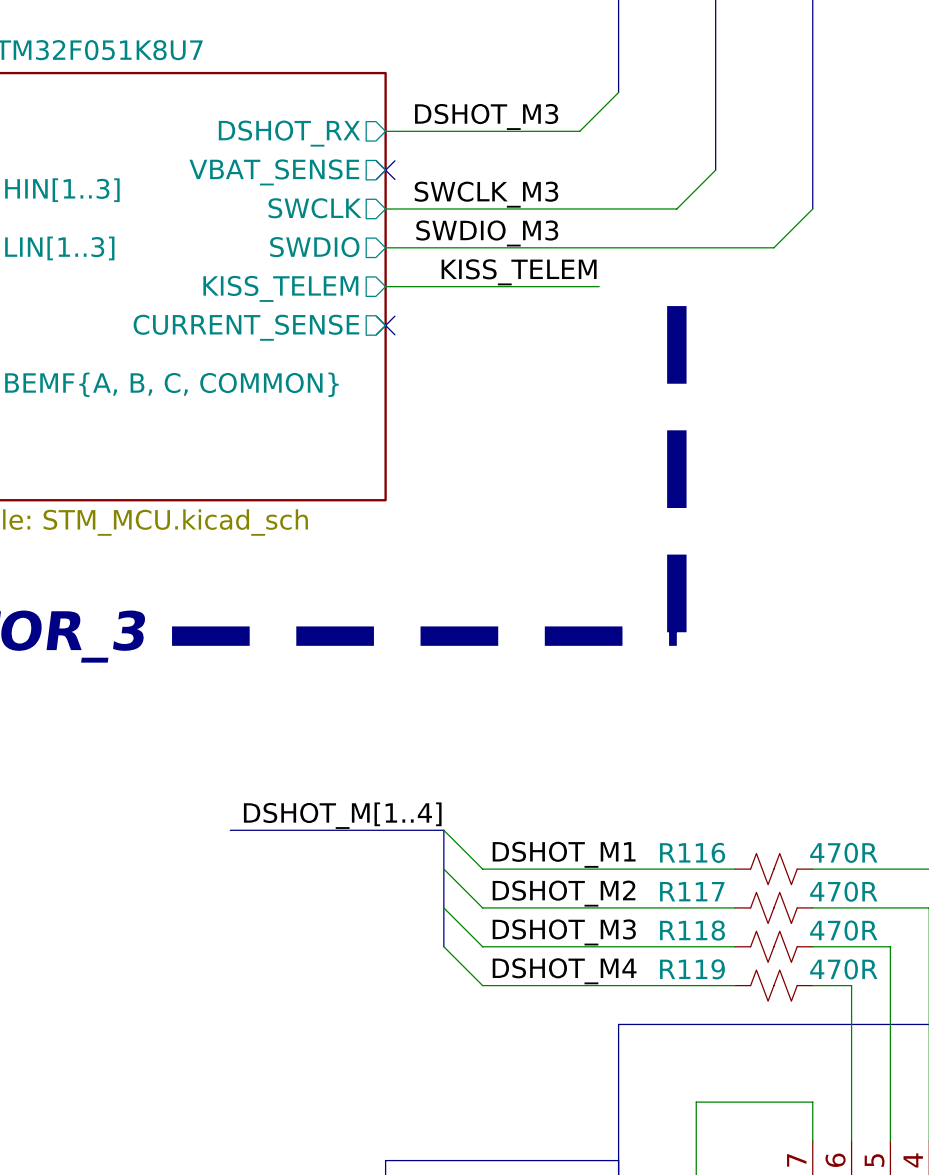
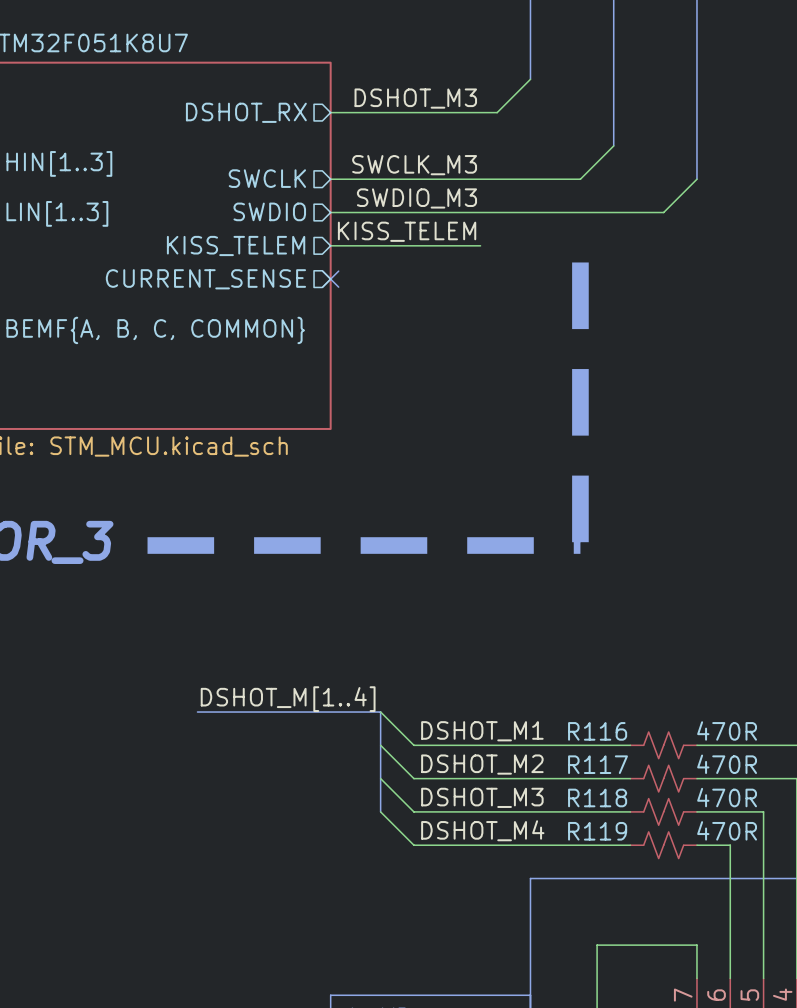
no-connect mark: (385, 170) -> none
sheet pin: VBAT_SENSE (274, 172) -> none
label position: KISS_TELEM (519, 272) -> KISS_TELEM (407, 231)
wire: (560, 286) (599, 286) -> none

